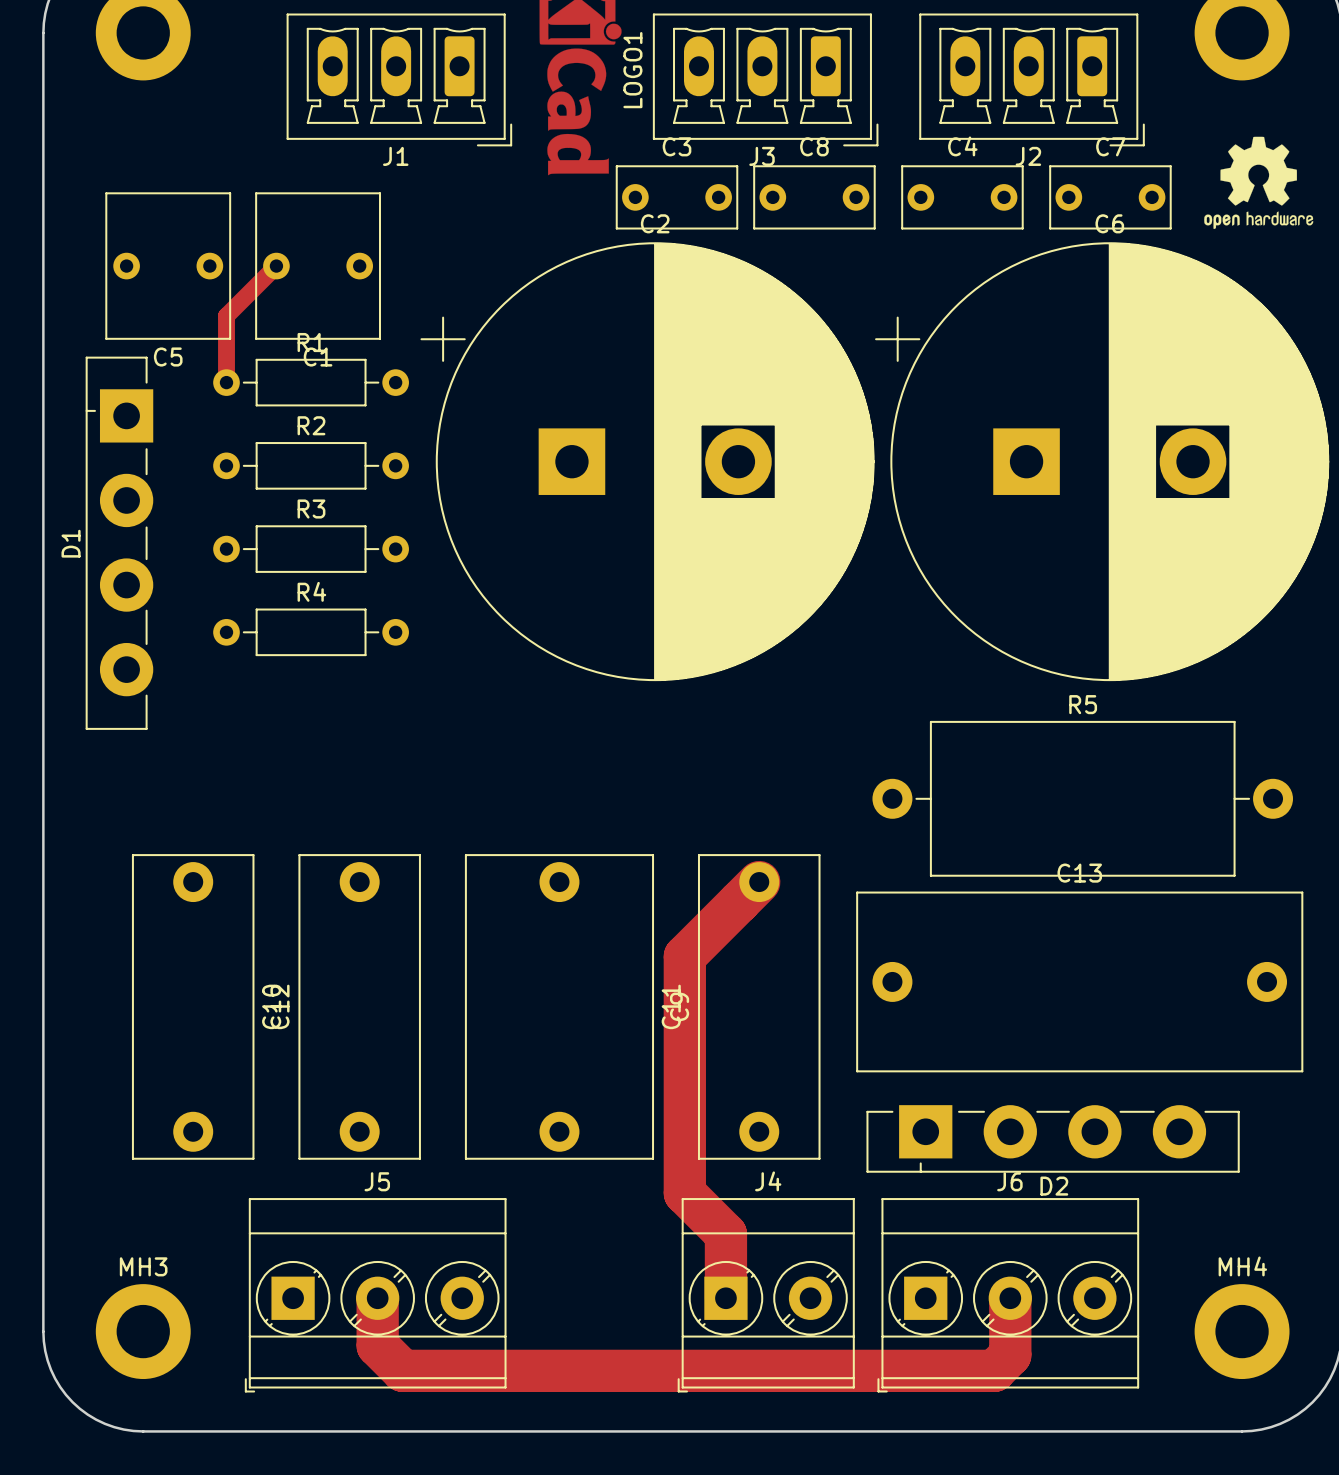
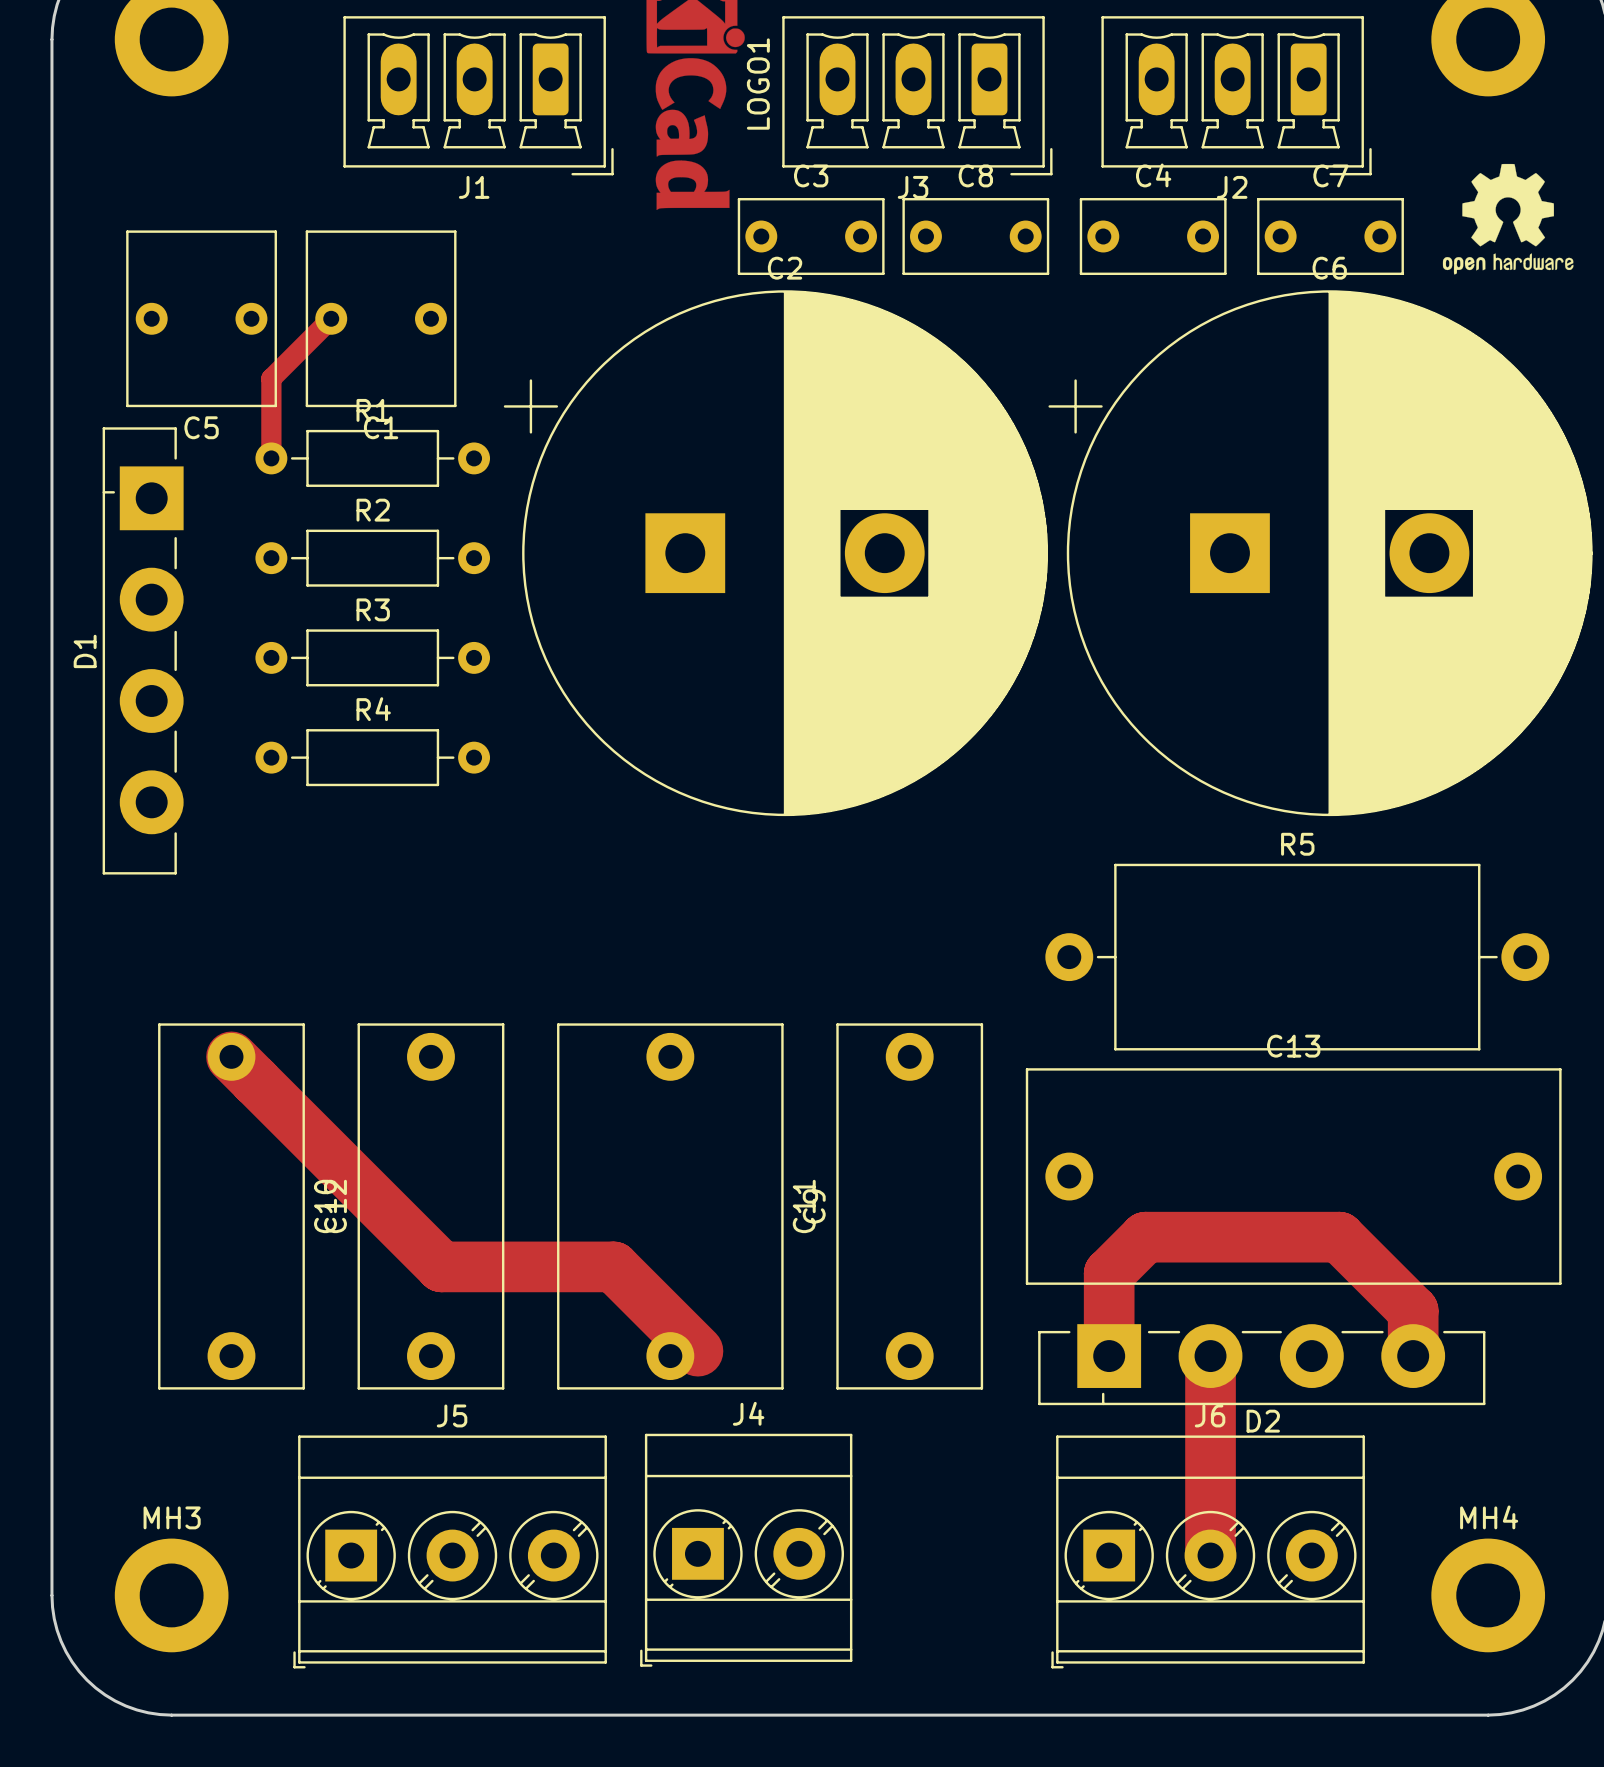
track: none -> (231, 1056) (441, 1266) (613, 1266) (697, 1351)
track: (759, 882) (684, 956) (684, 1193) (725, 1234) (725, 1298) -> none
track: none -> (1109, 1356) (1109, 1273) (1145, 1237) (1339, 1237) (1413, 1310) (1413, 1356)
J4 position: (766, 1295) -> (746, 1550)
track: (377, 1298) (377, 1345) (402, 1370) (994, 1370) (1010, 1354) (1010, 1298) -> (1210, 1356) (1210, 1555)

